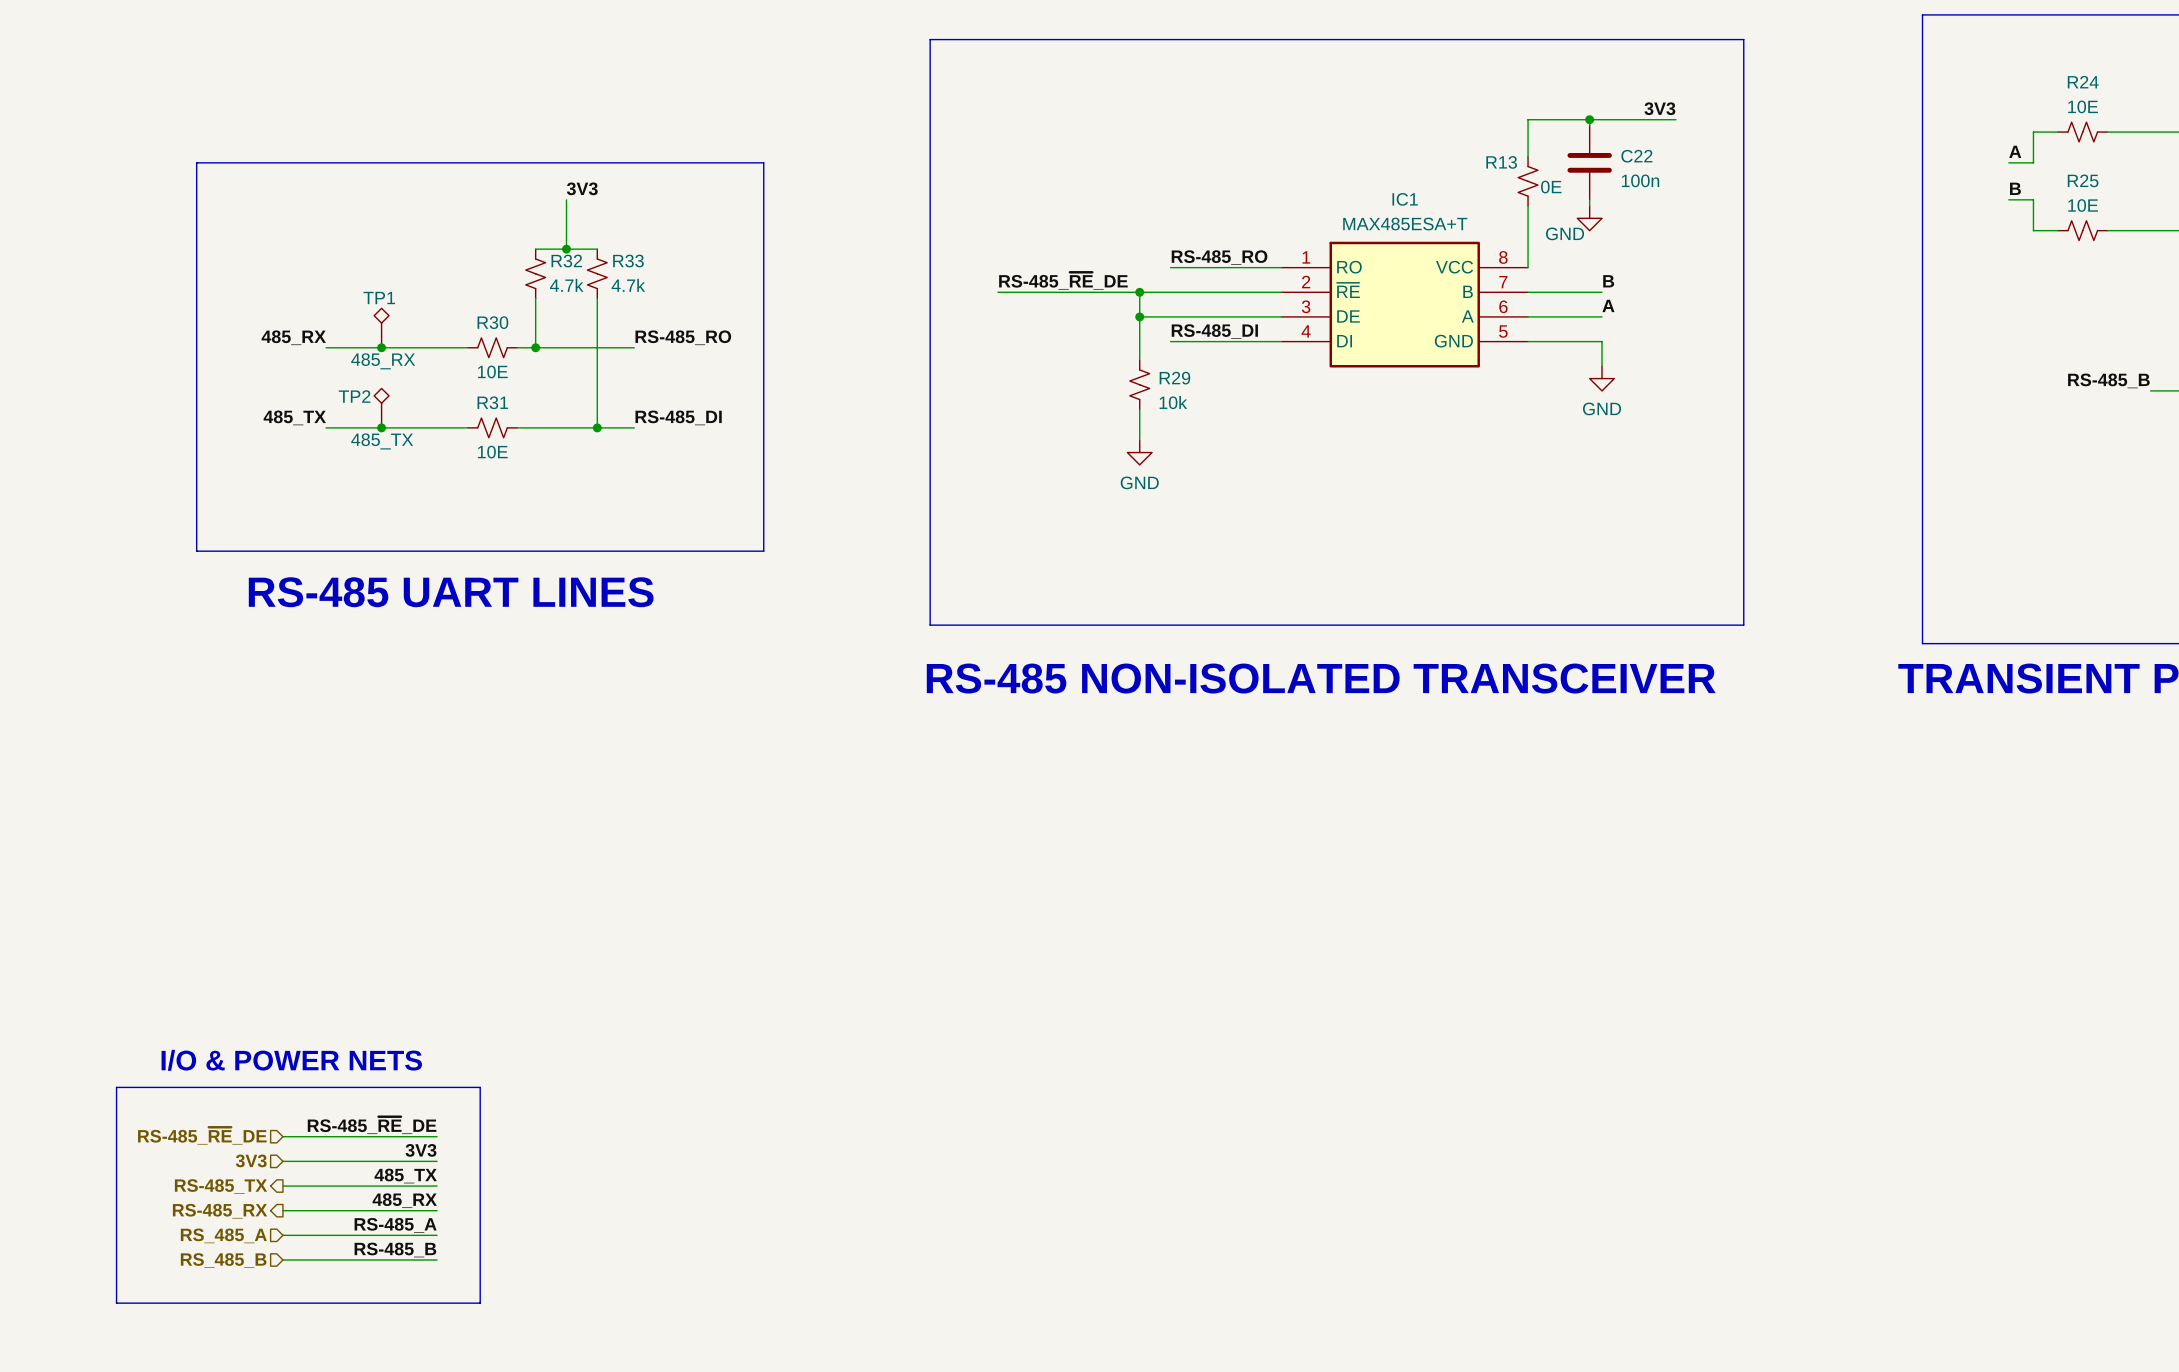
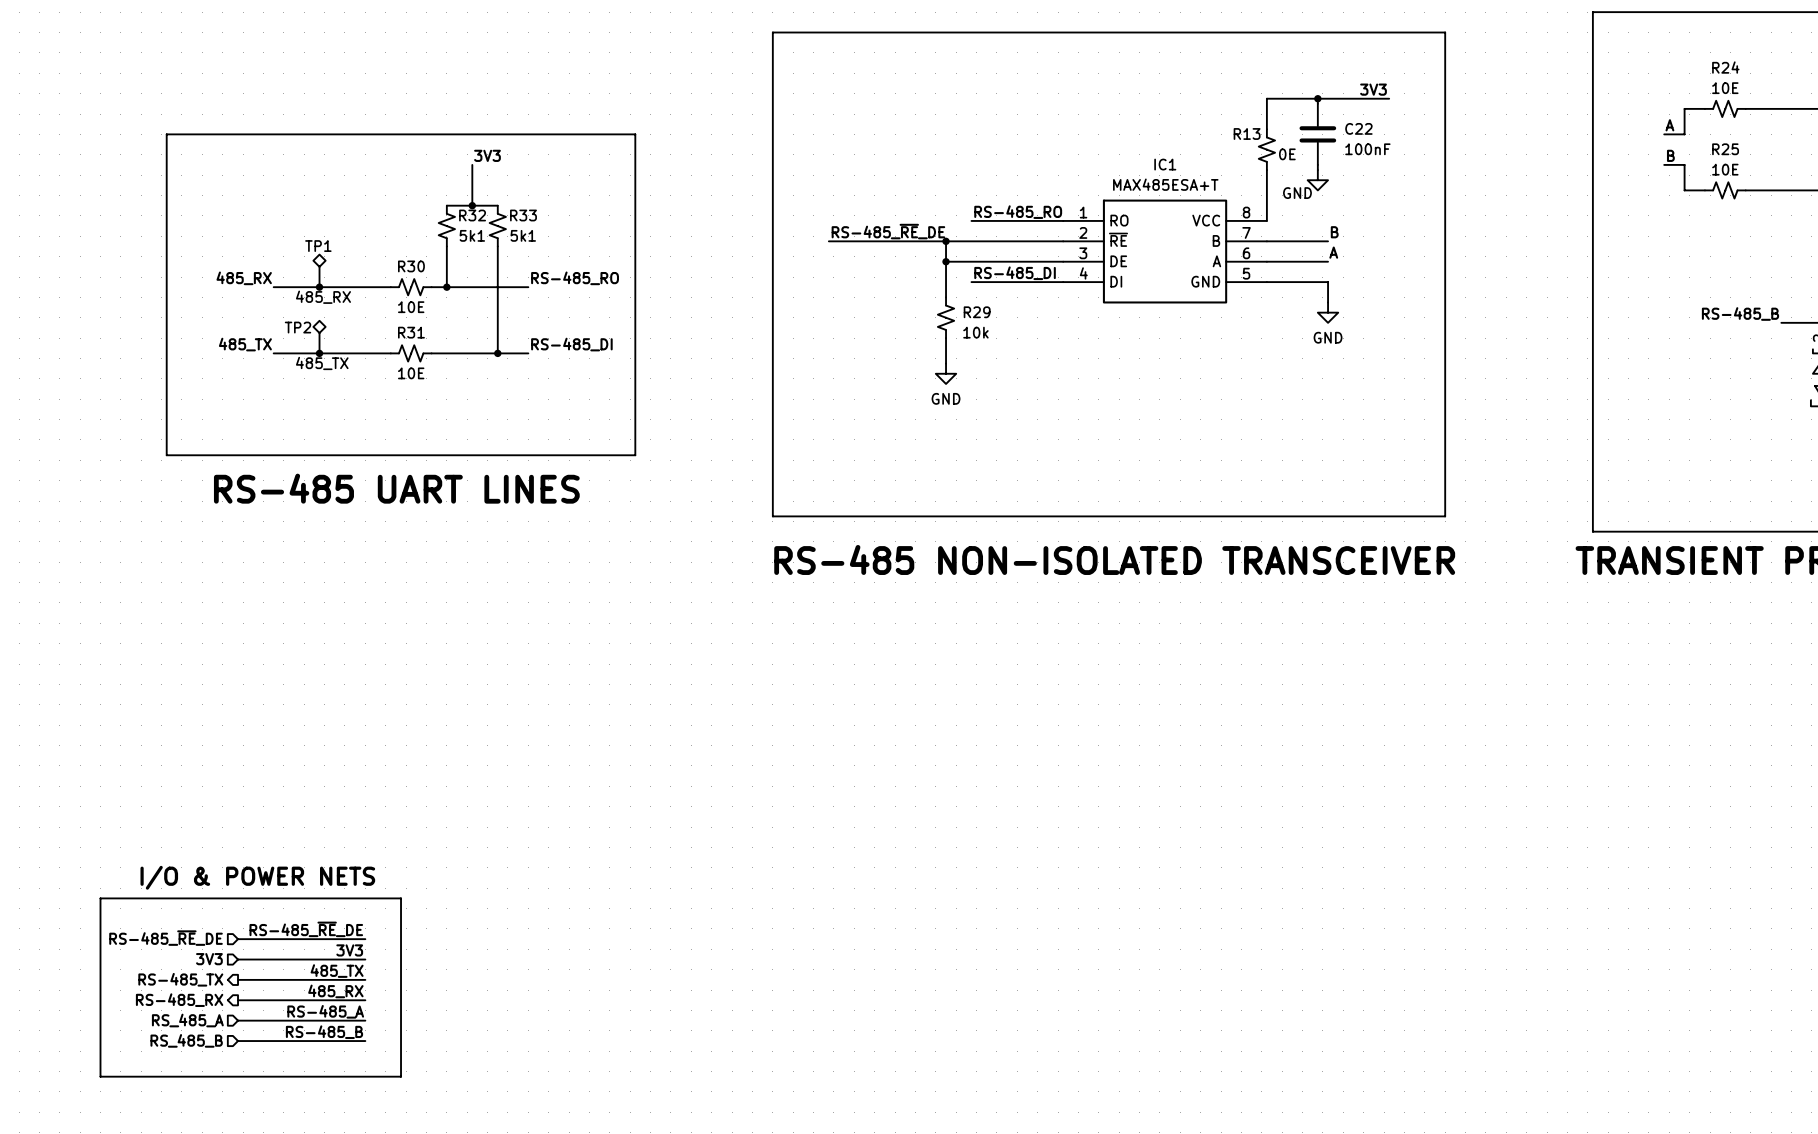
C22 value: 100n (1640, 180) -> 100nF (1367, 149)
R32 value: 4.7k (566, 285) -> 5k1 (472, 235)
R33 value: 4.7k (628, 285) -> 5k1 (523, 235)

